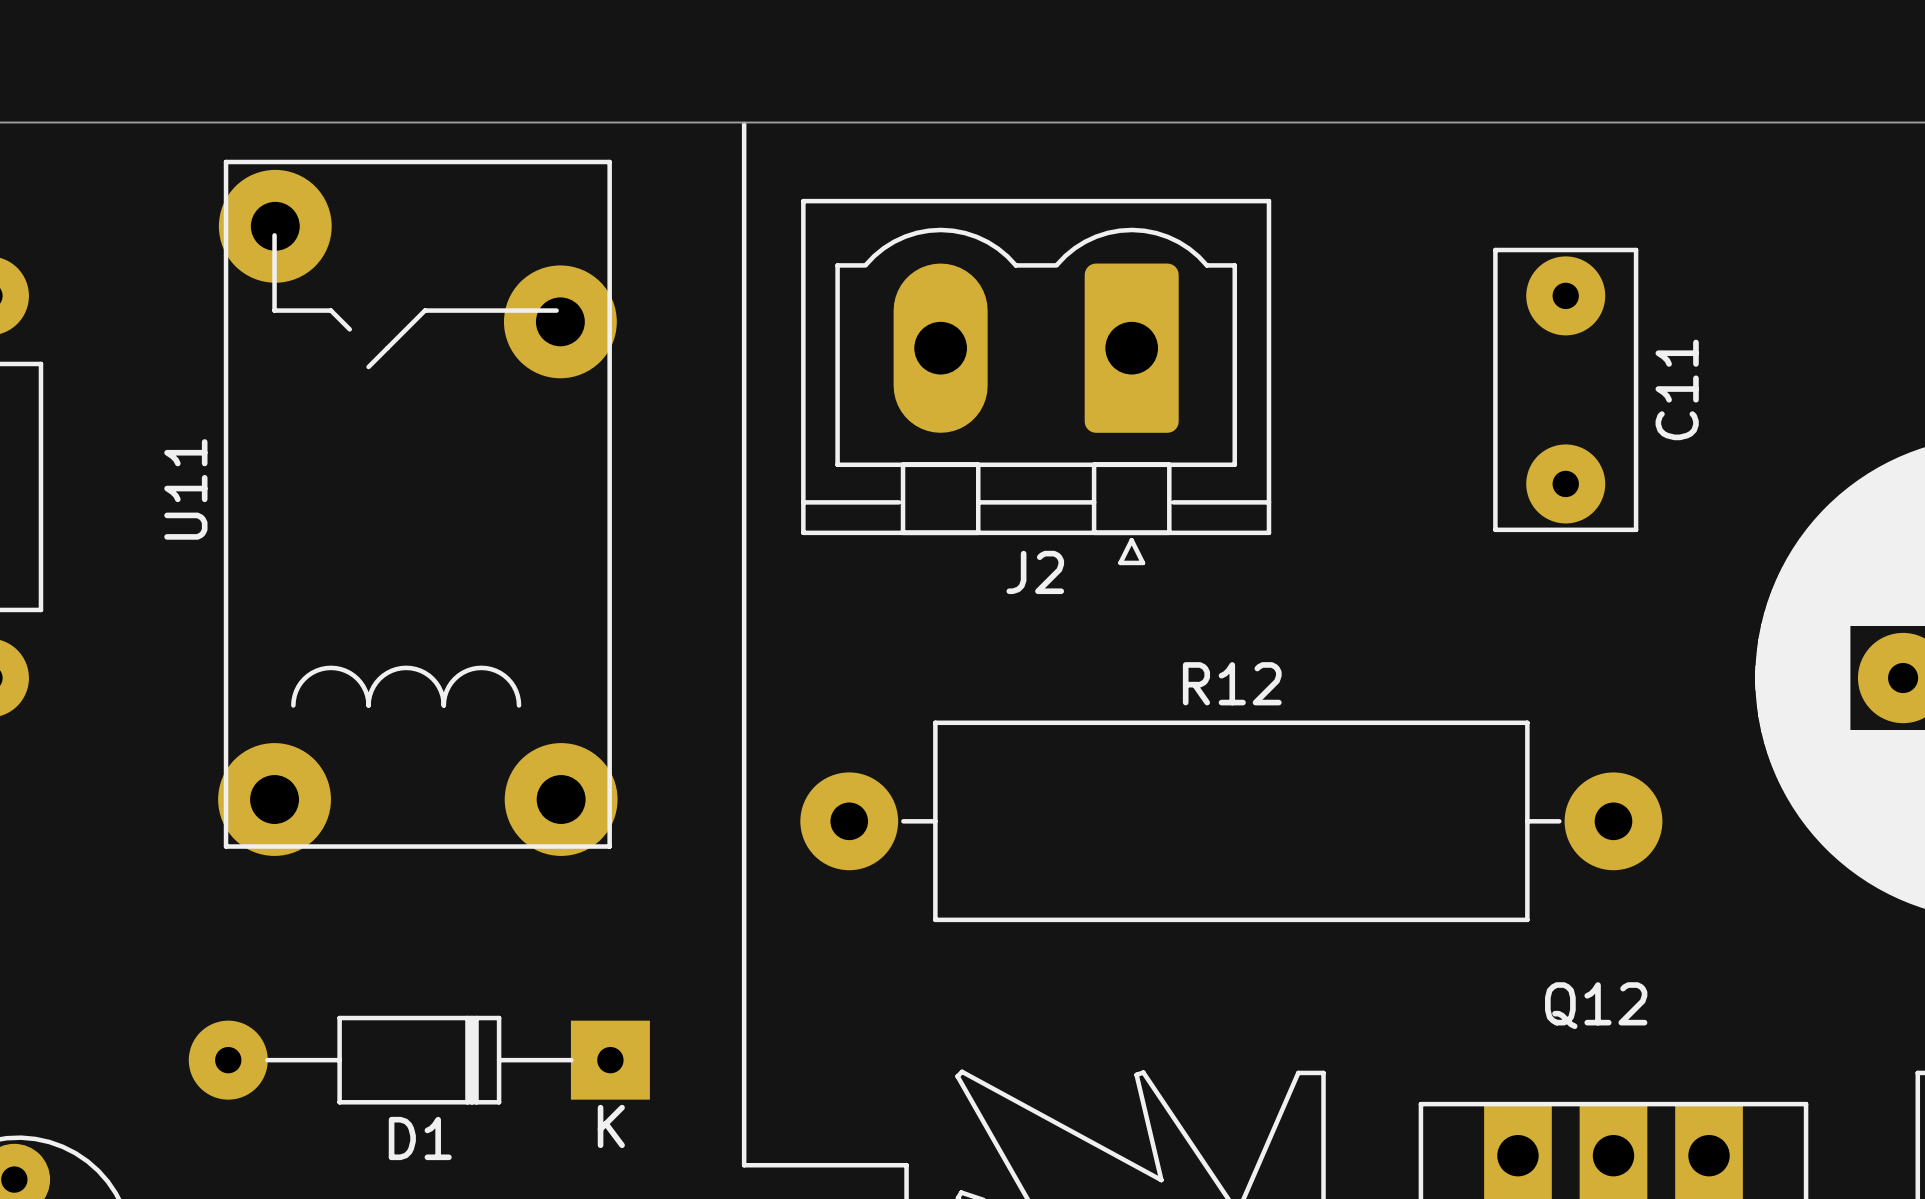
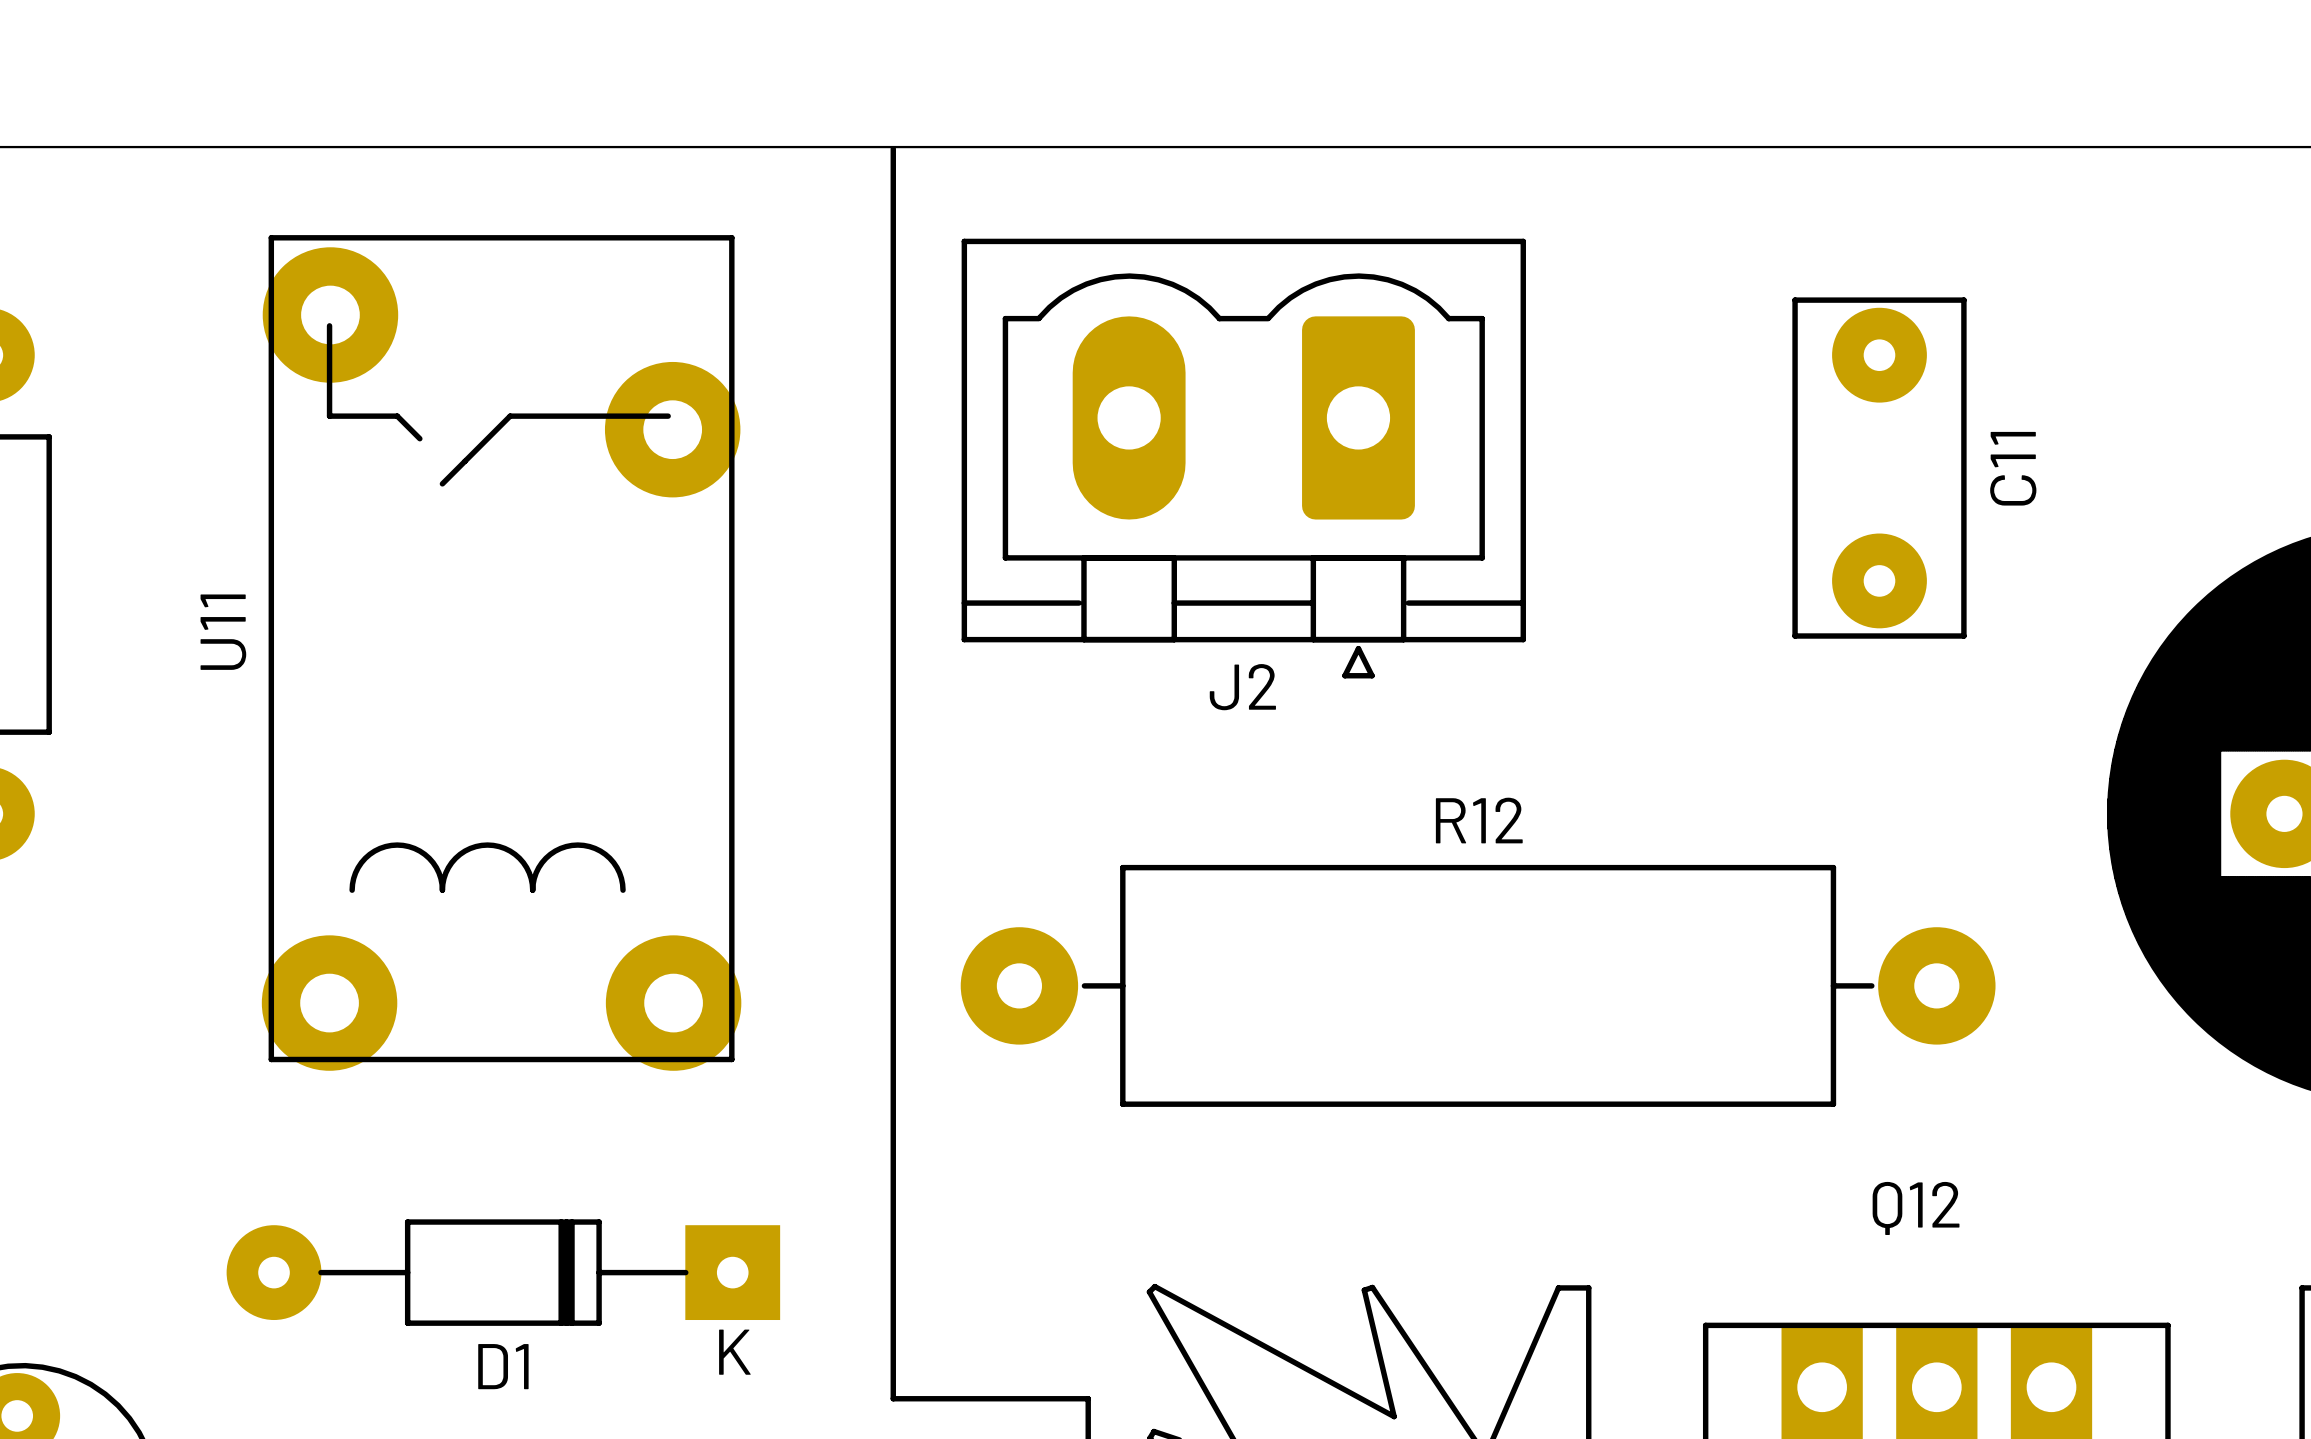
U11 position: (417, 507) -> (501, 652)

